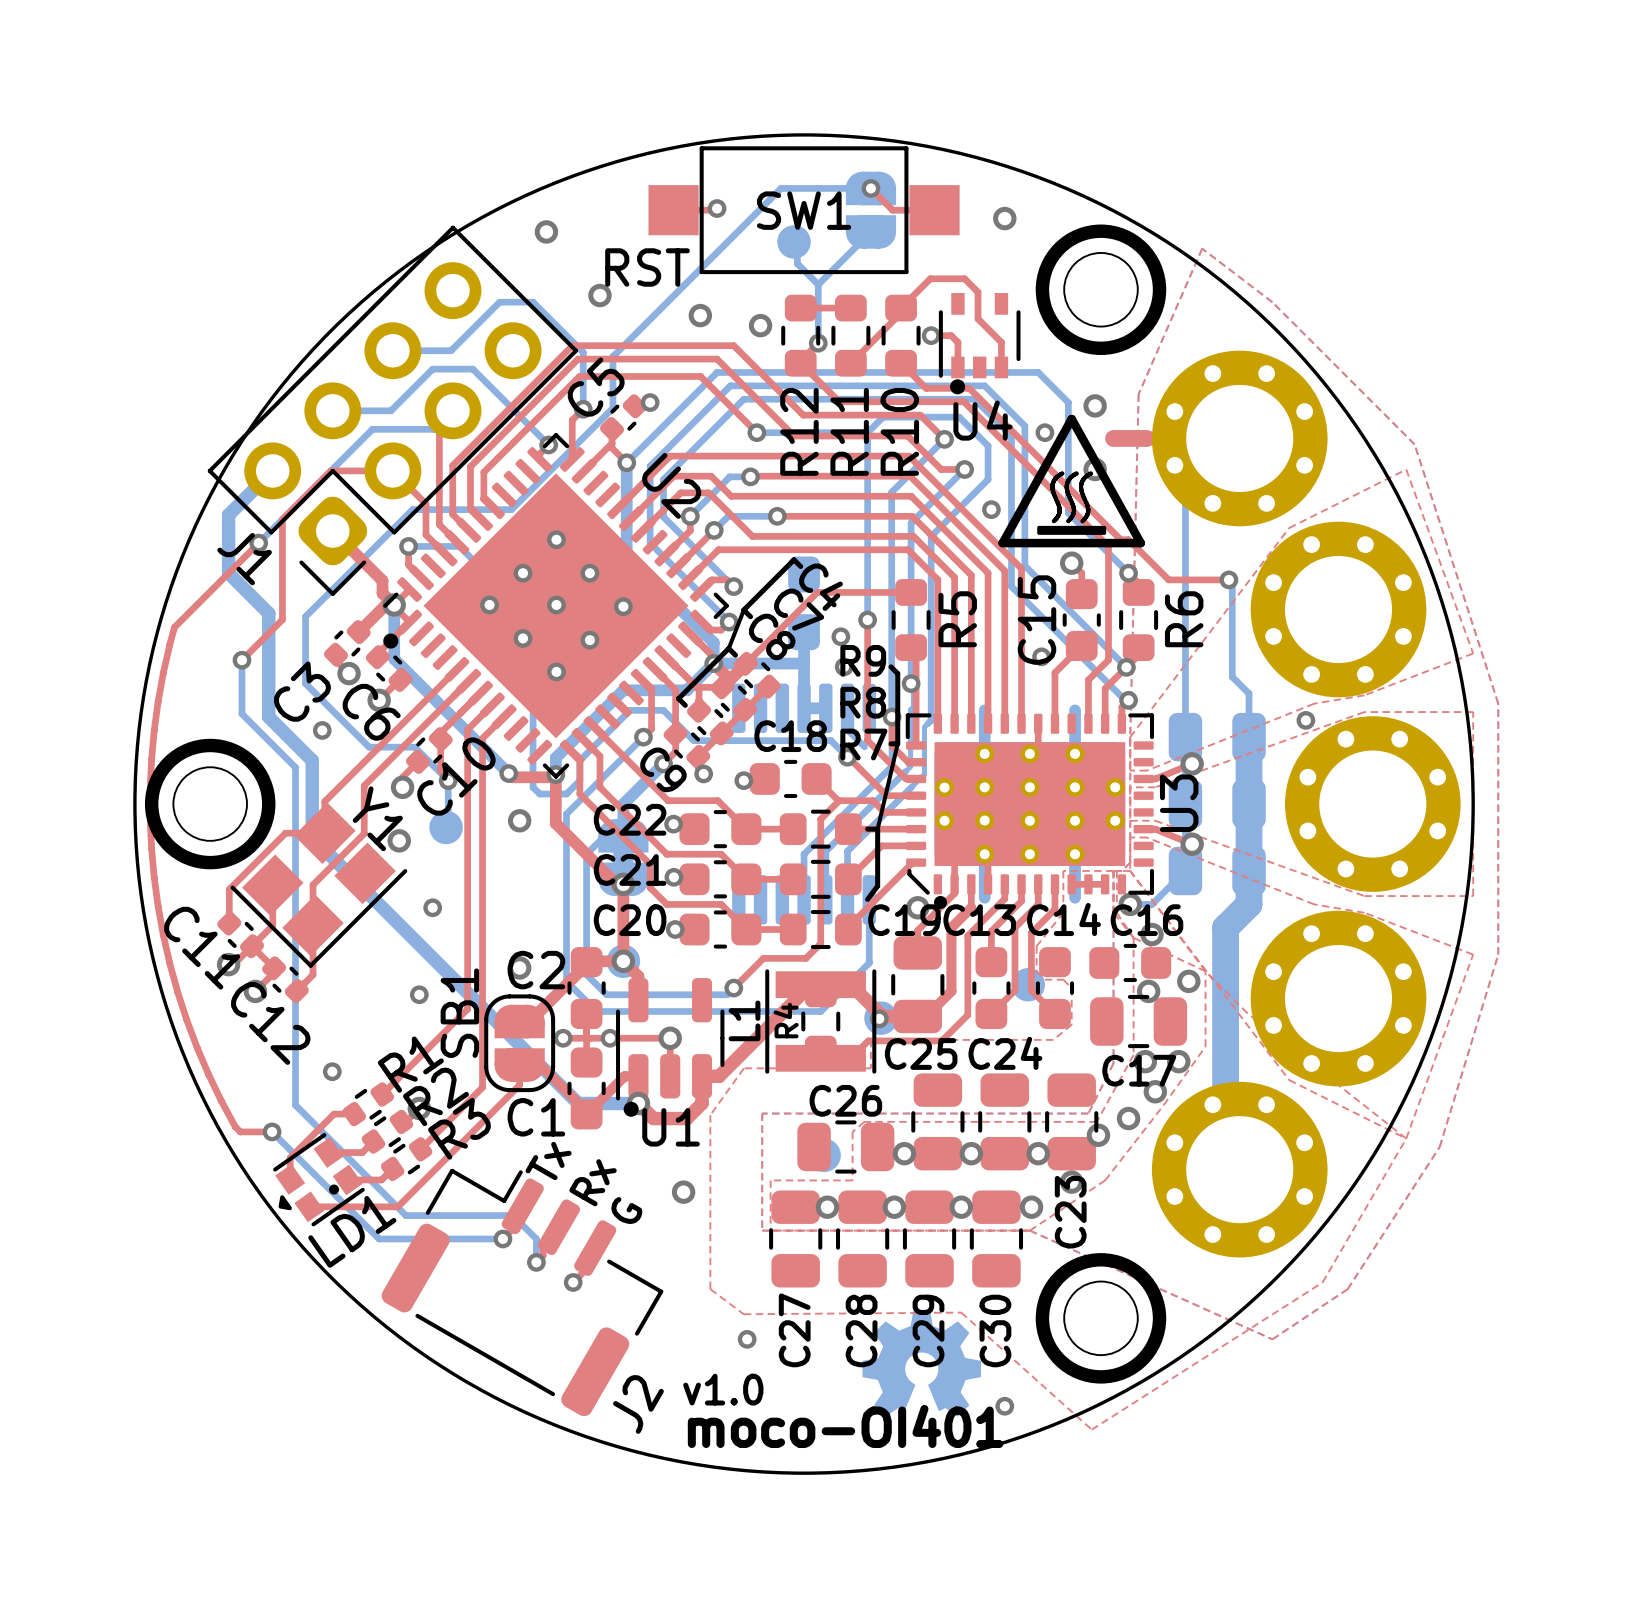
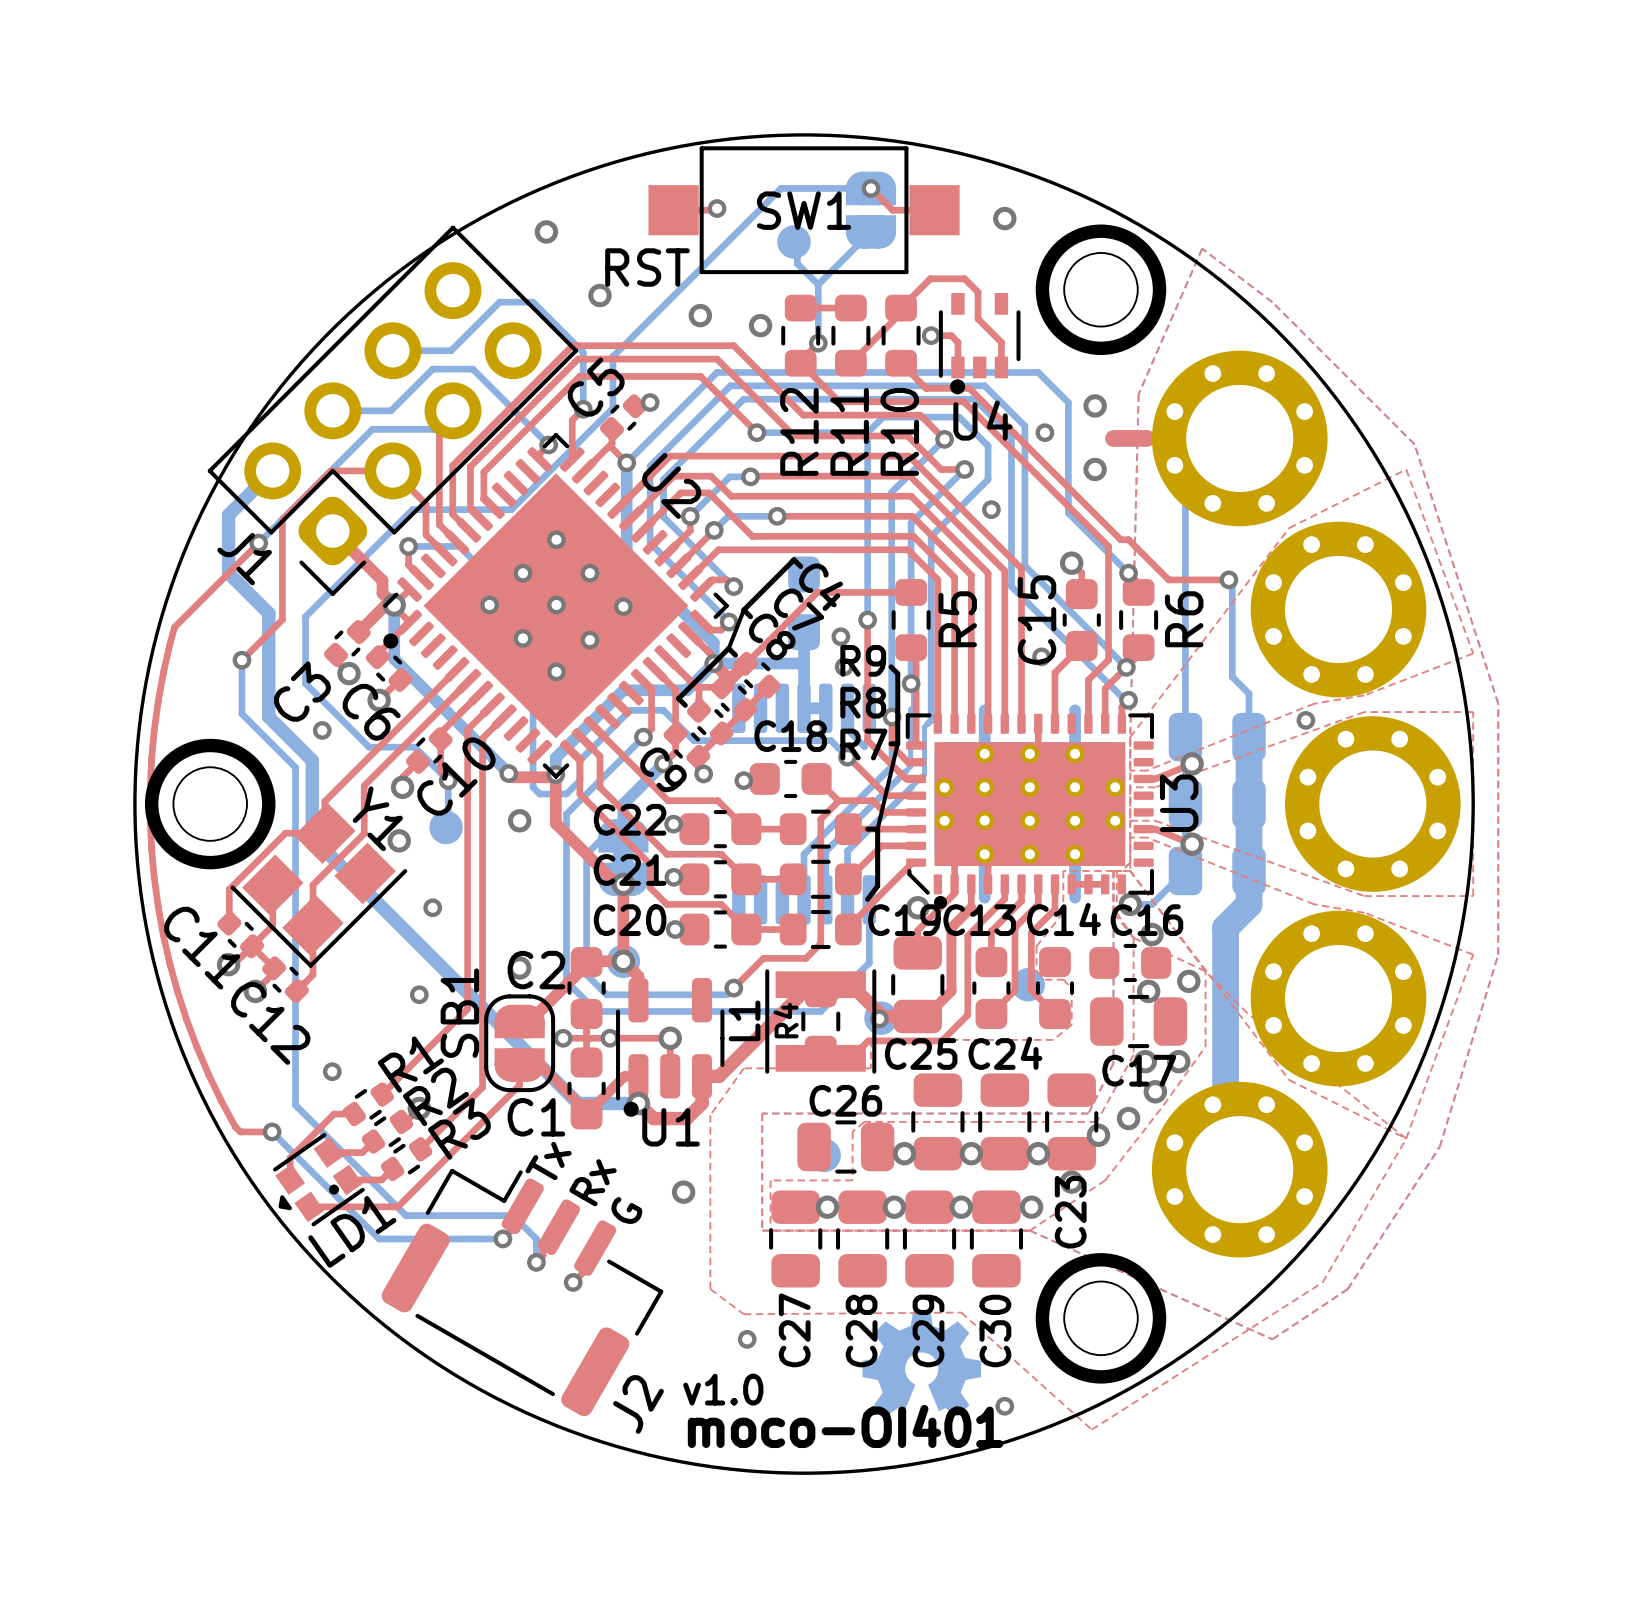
line: (1071, 419) (1140, 543) (1002, 543) (1071, 419) -> none
line: (1061, 473) (1055, 478) (1052, 484) (1059, 509) (1053, 521) -> none
line: (1076, 473) (1069, 478) (1066, 484) (1073, 509) (1068, 521) -> none
line: (1090, 473) (1084, 478) (1081, 484) (1088, 509) (1082, 521) -> none
drawing: [1037, 525, 1107, 535] -> none

